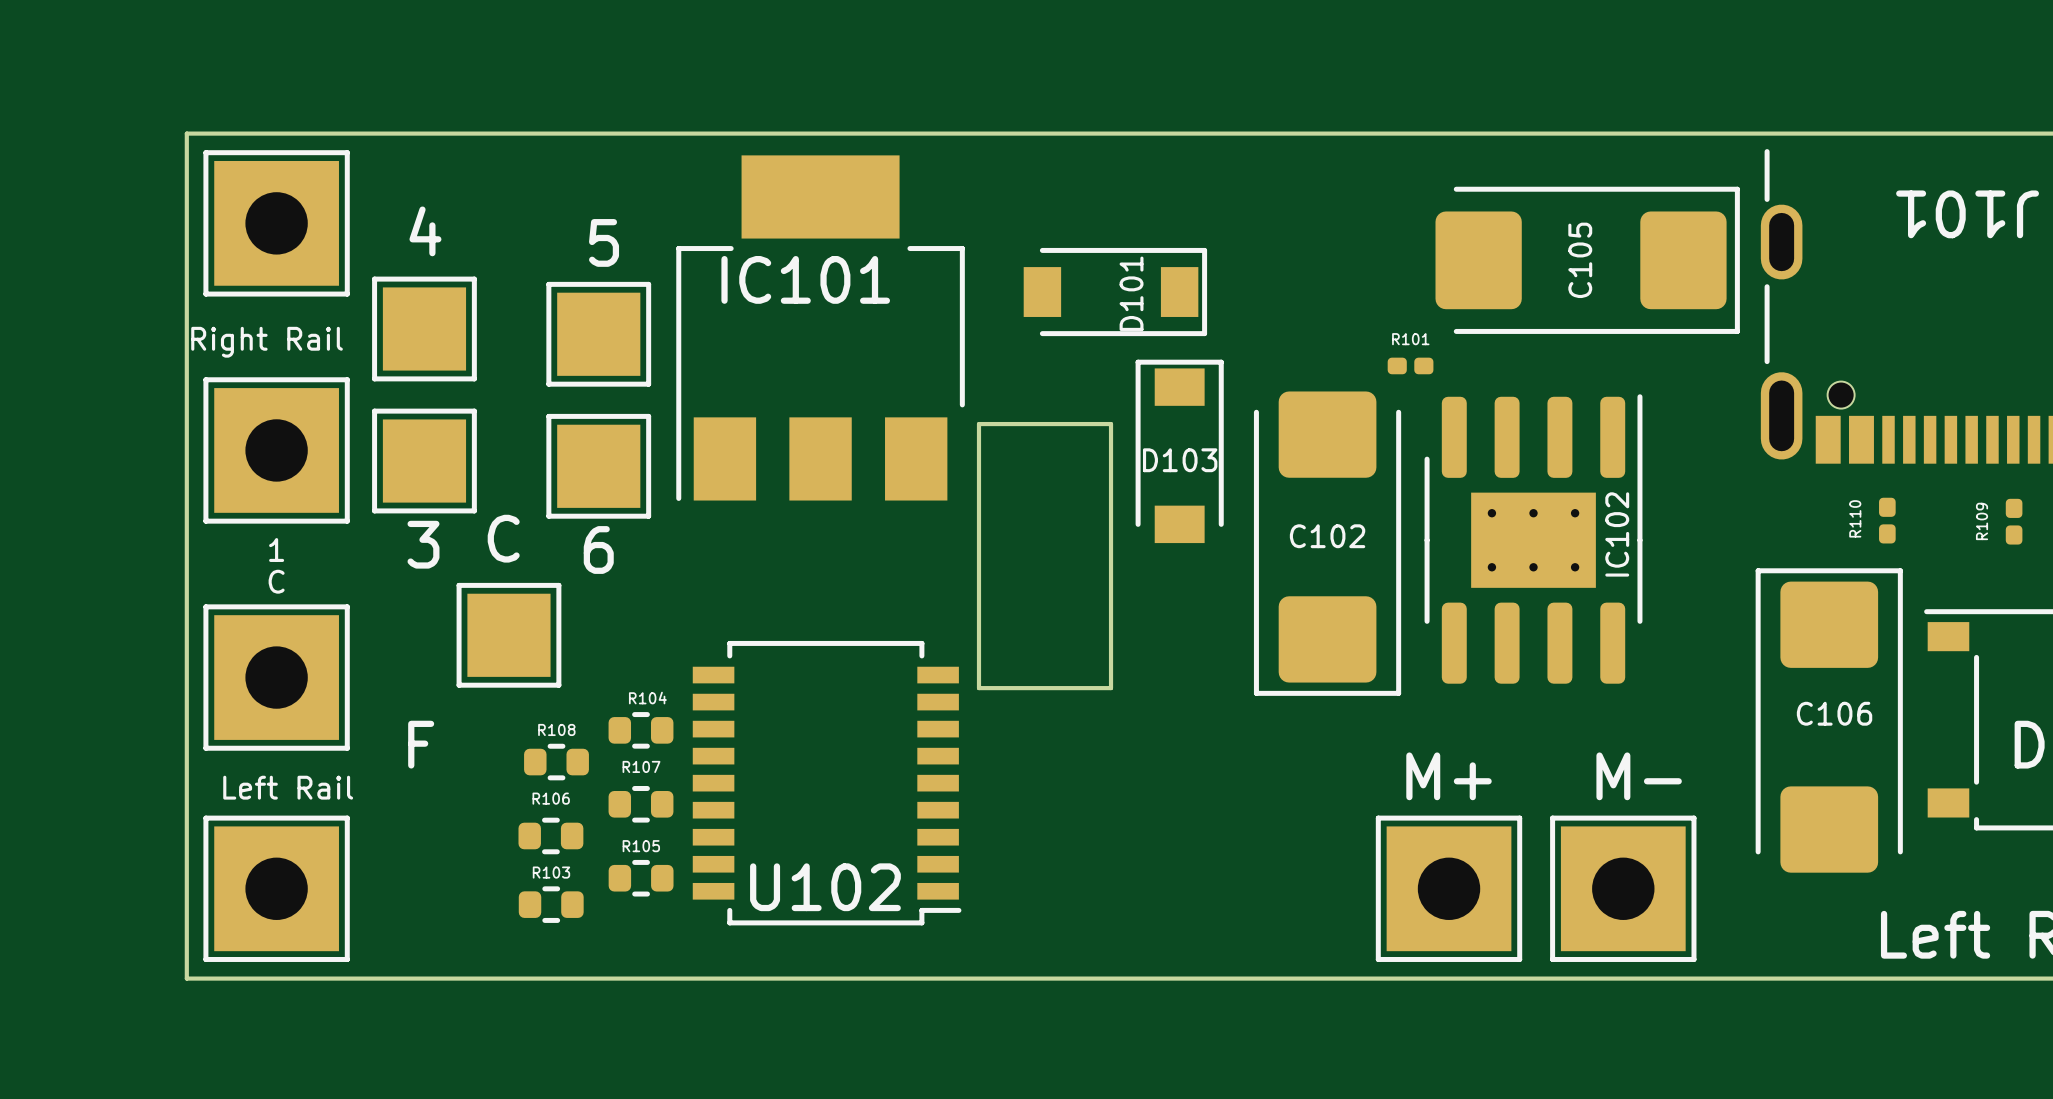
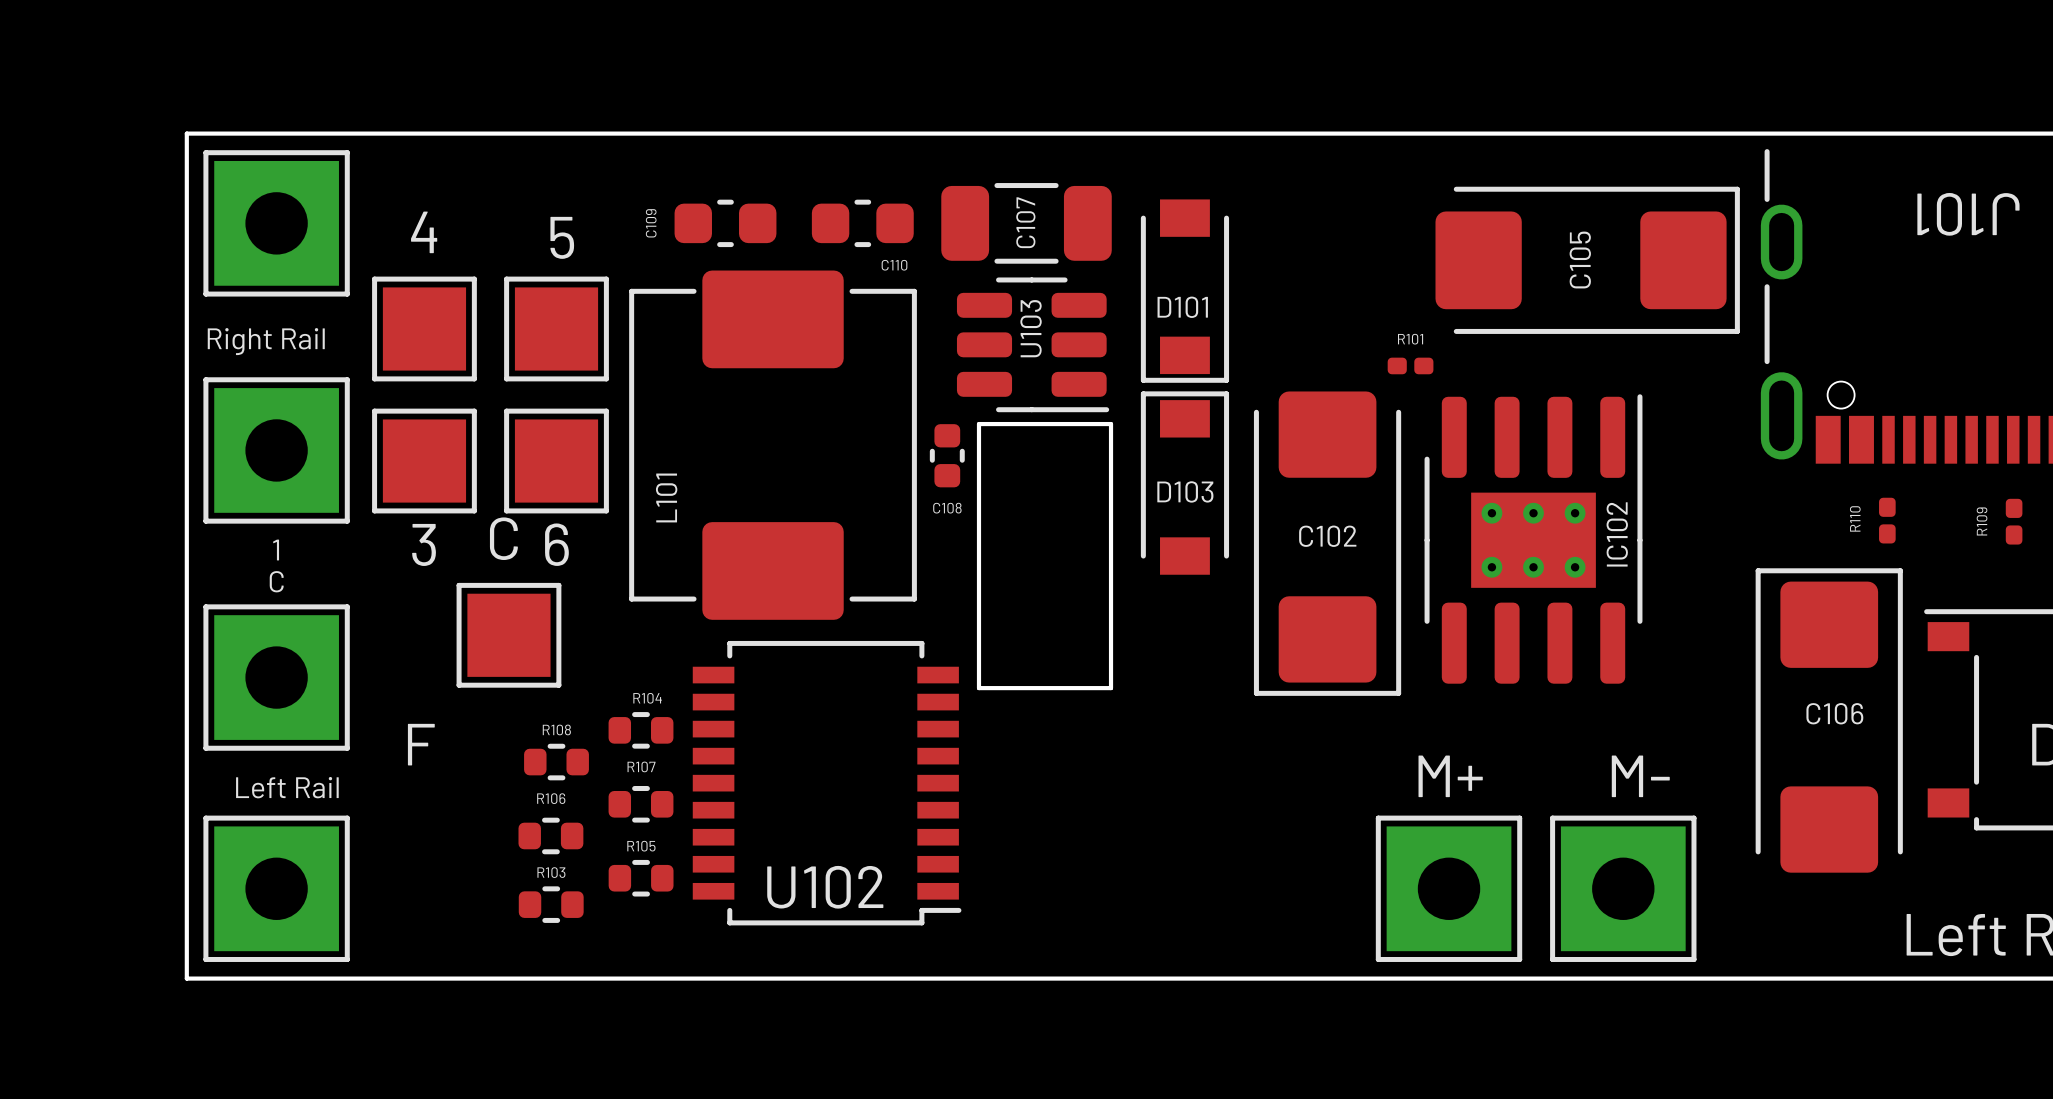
C109: none -> (725, 223)
C110: none -> (862, 223)
C107: none -> (1026, 223)
D101 rotation: 0° (1115, 292) -> 90° clockwise (1184, 291)
IC101: (820, 328) -> none
part position: (598, 334) -> (556, 328)
U103: none -> (1033, 344)
L101: none -> (773, 445)
D103 position: (1179, 451) -> (1184, 483)
C108: none -> (947, 455)
part position: (598, 466) -> (556, 461)

